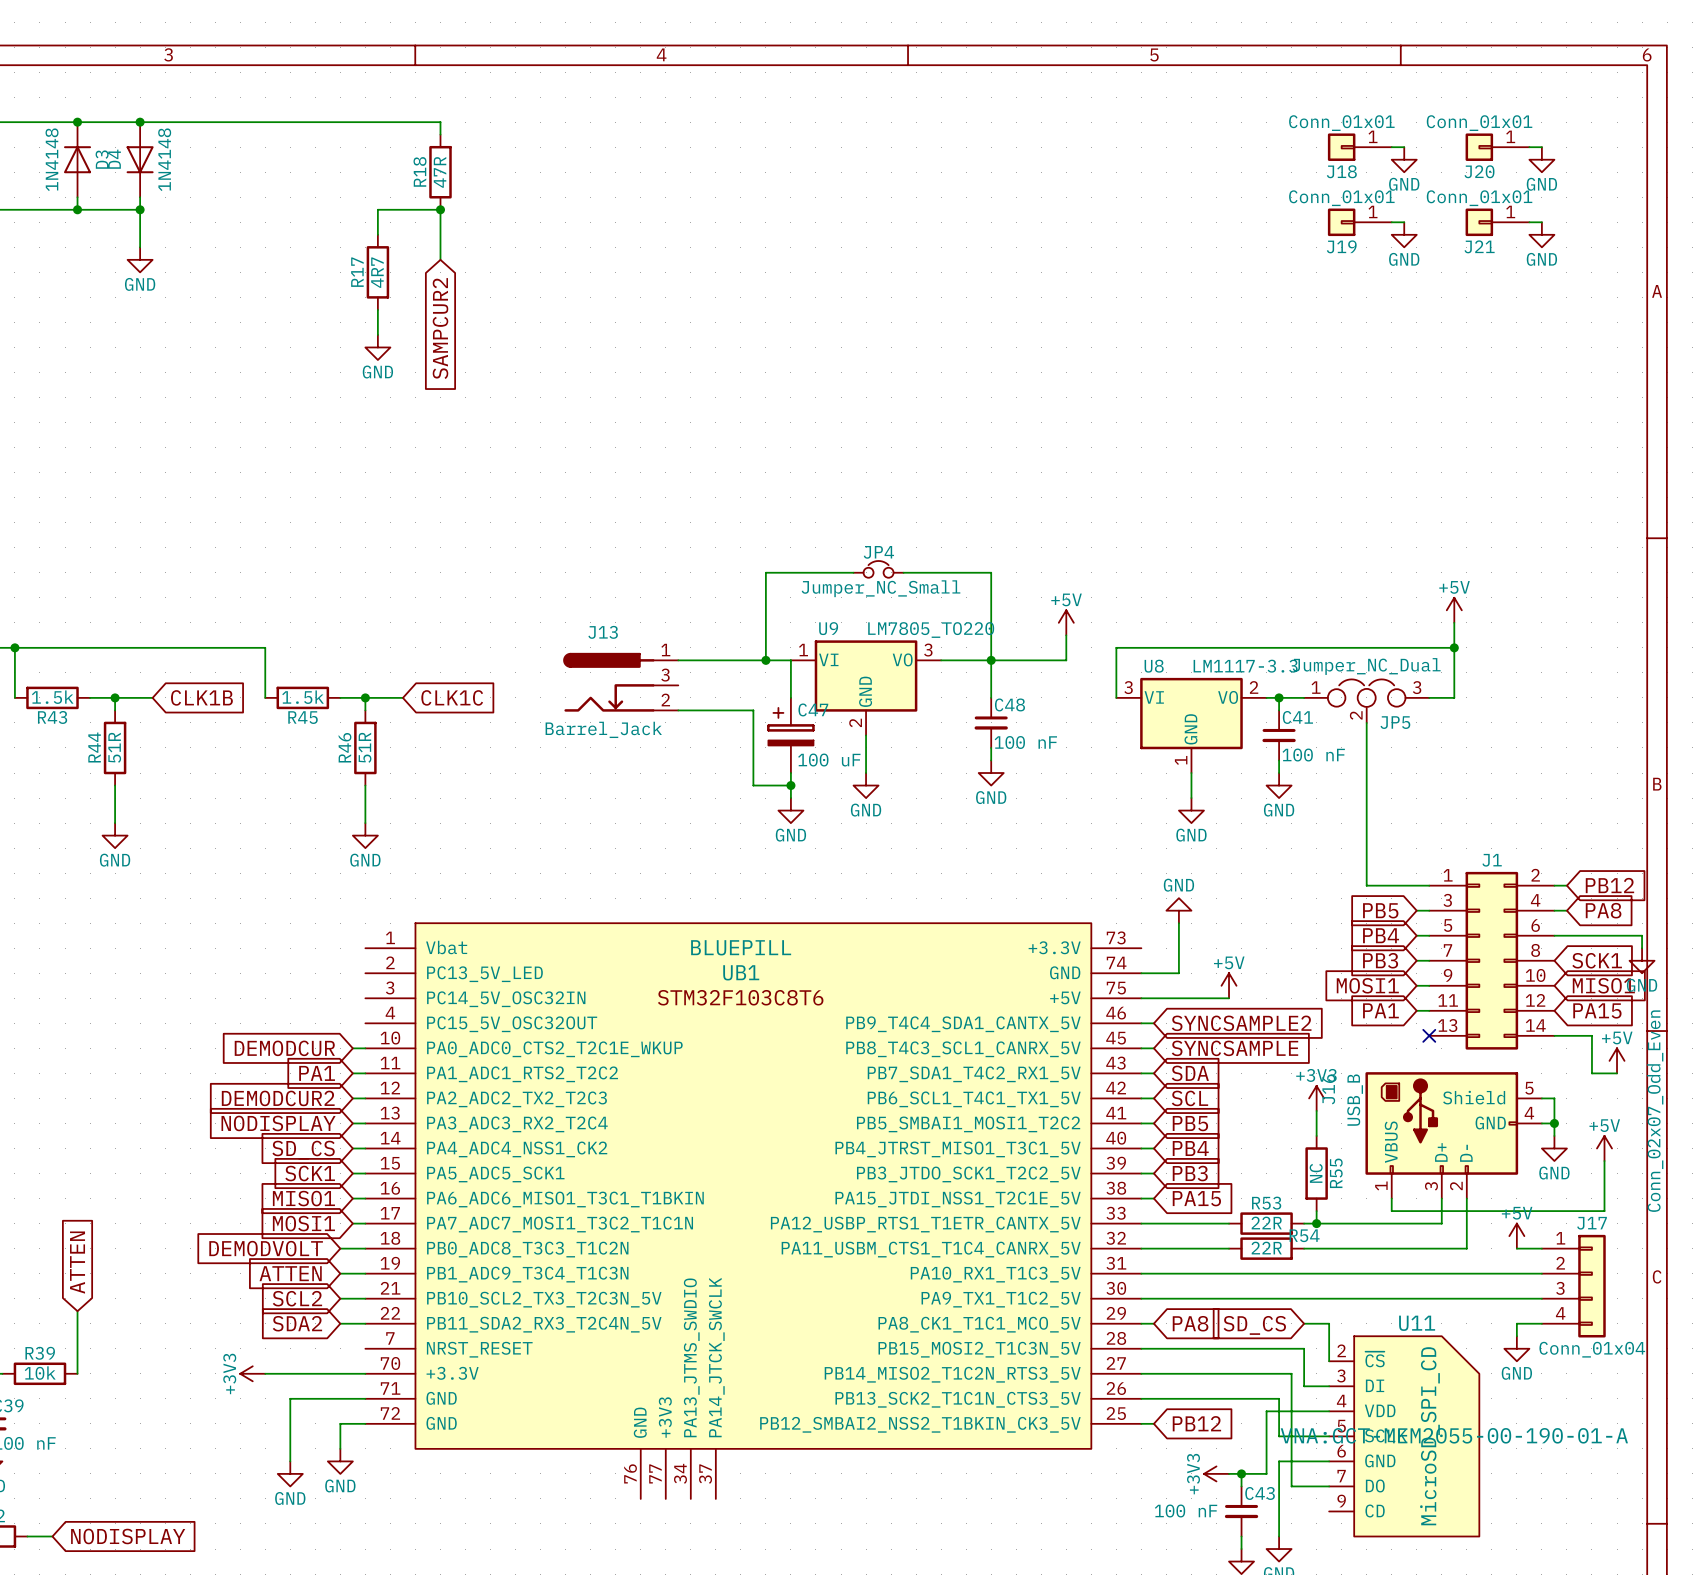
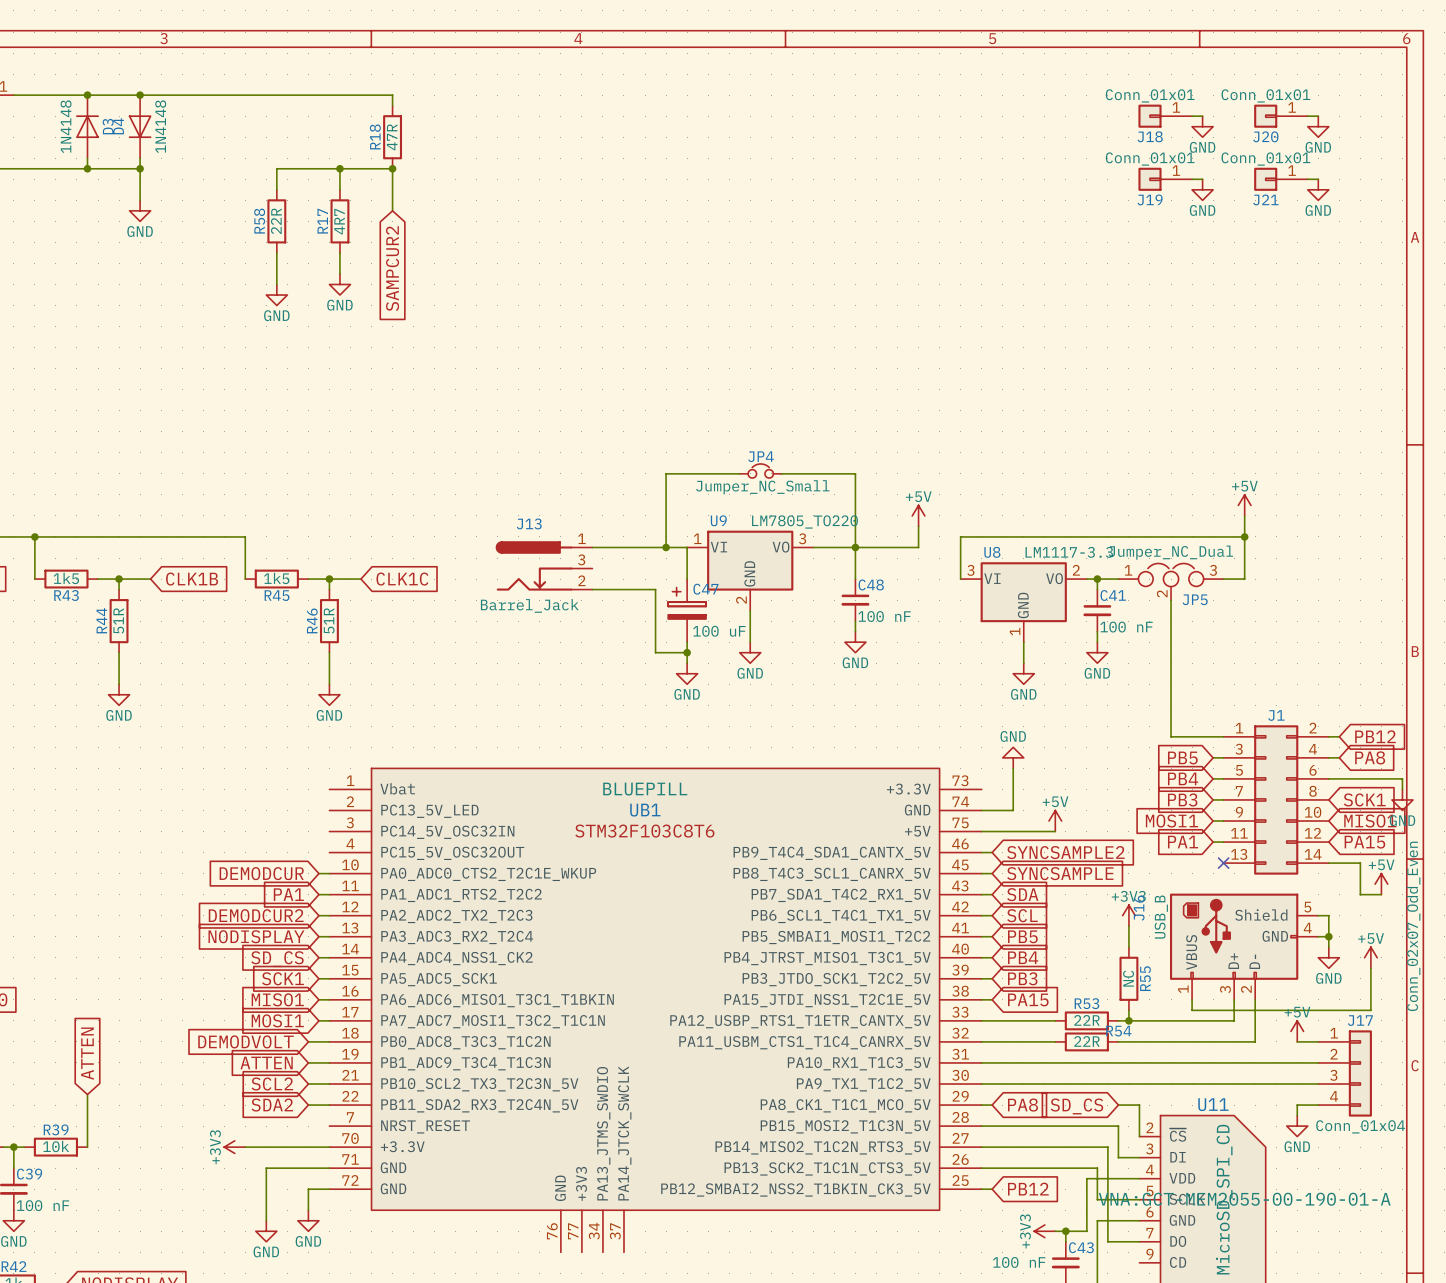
wire: none -> (339, 168) (276, 168) (276, 189)
junction: none -> (339, 168)
R58: none -> 22R (276, 221)
wire: none -> (276, 252) (276, 284)
power symbol: none -> GND (276, 295)
R43 value: 1.5k (52, 697) -> 1k5 (66, 578)
R45 value: 1.5k (303, 697) -> 1k5 (276, 578)

